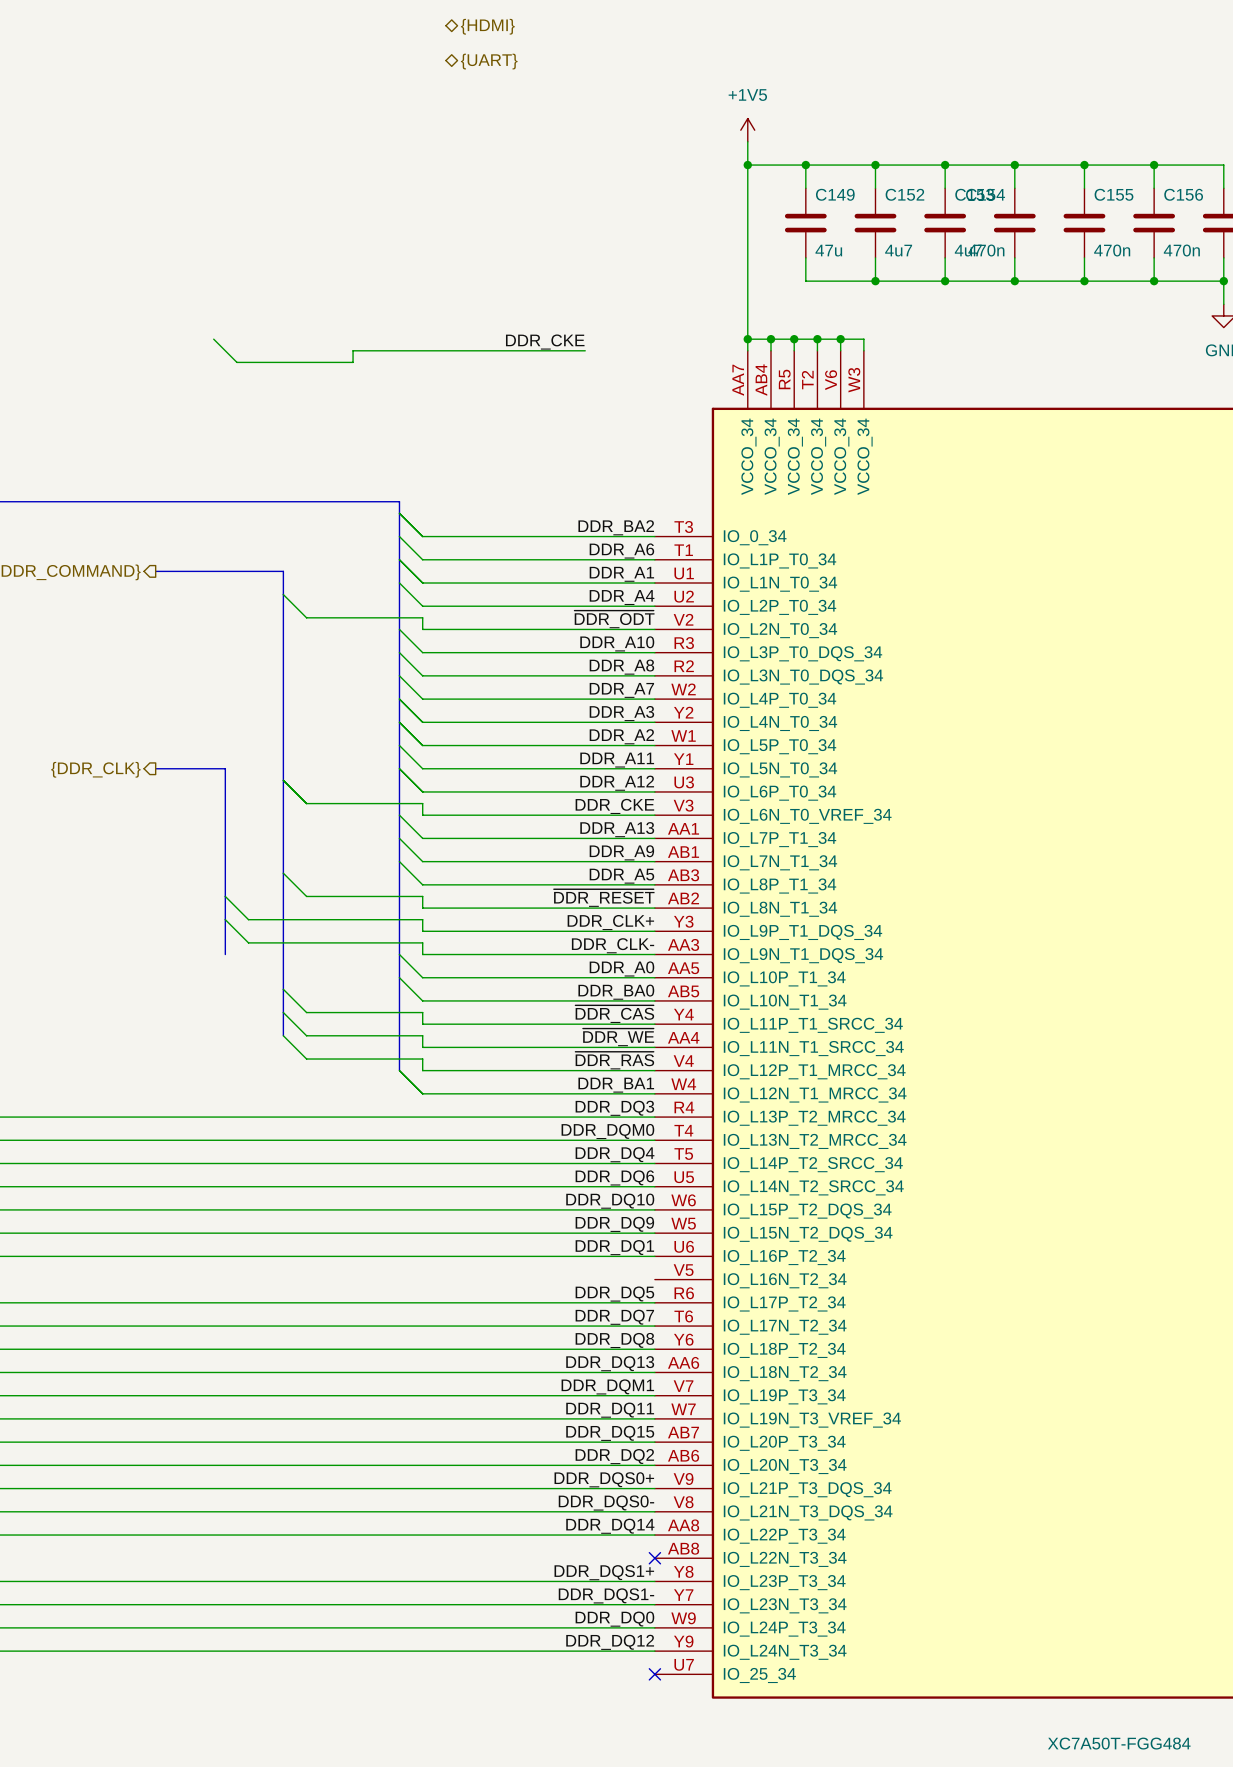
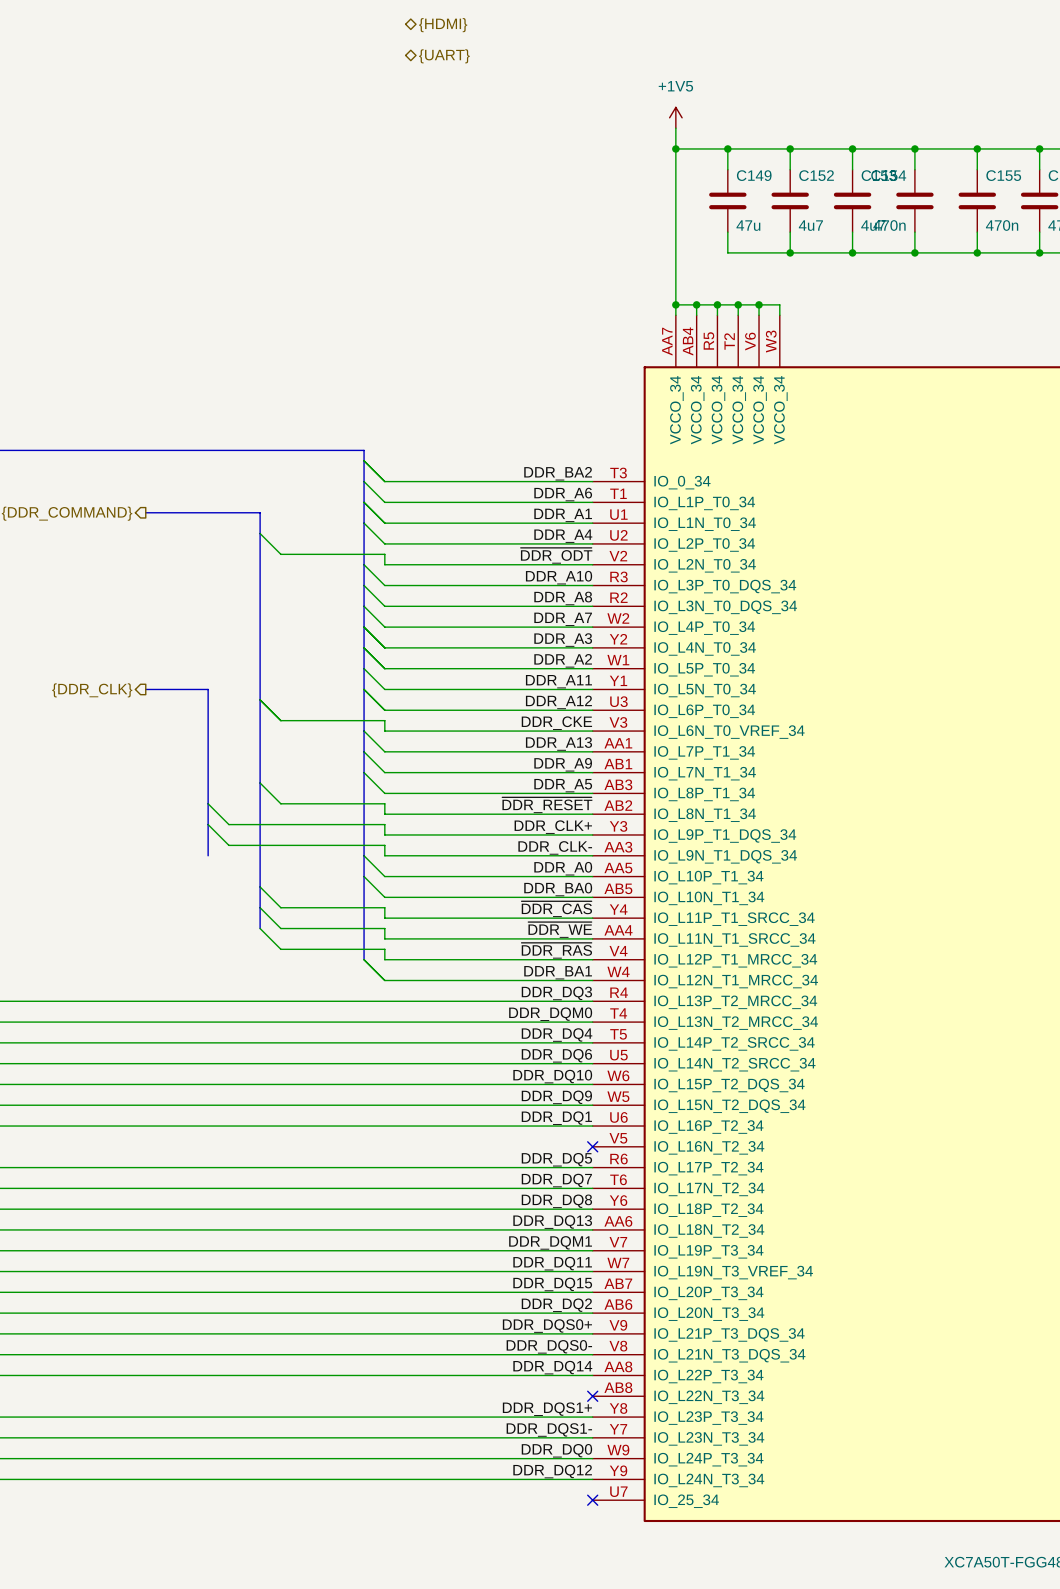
wire: (213, 339) (236, 362) (353, 362) (353, 350) (585, 350) -> none
label: DDR_CKE (545, 342) -> none
no-connect mark: none -> (592, 1146)

